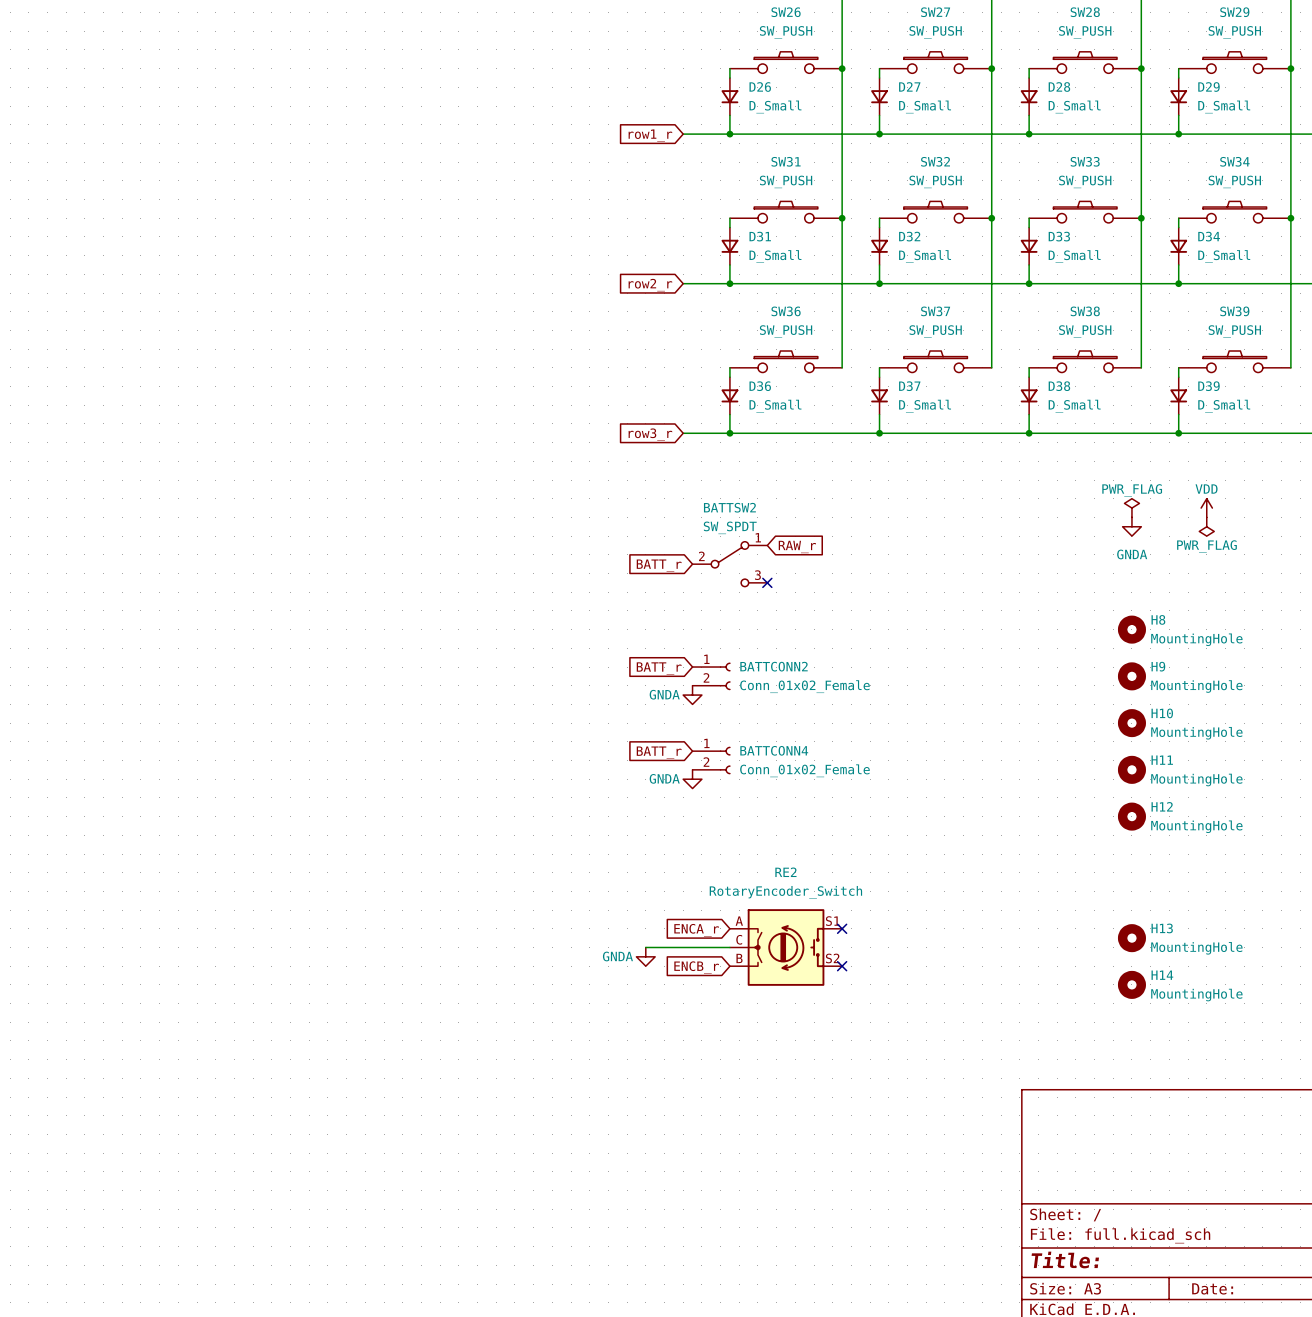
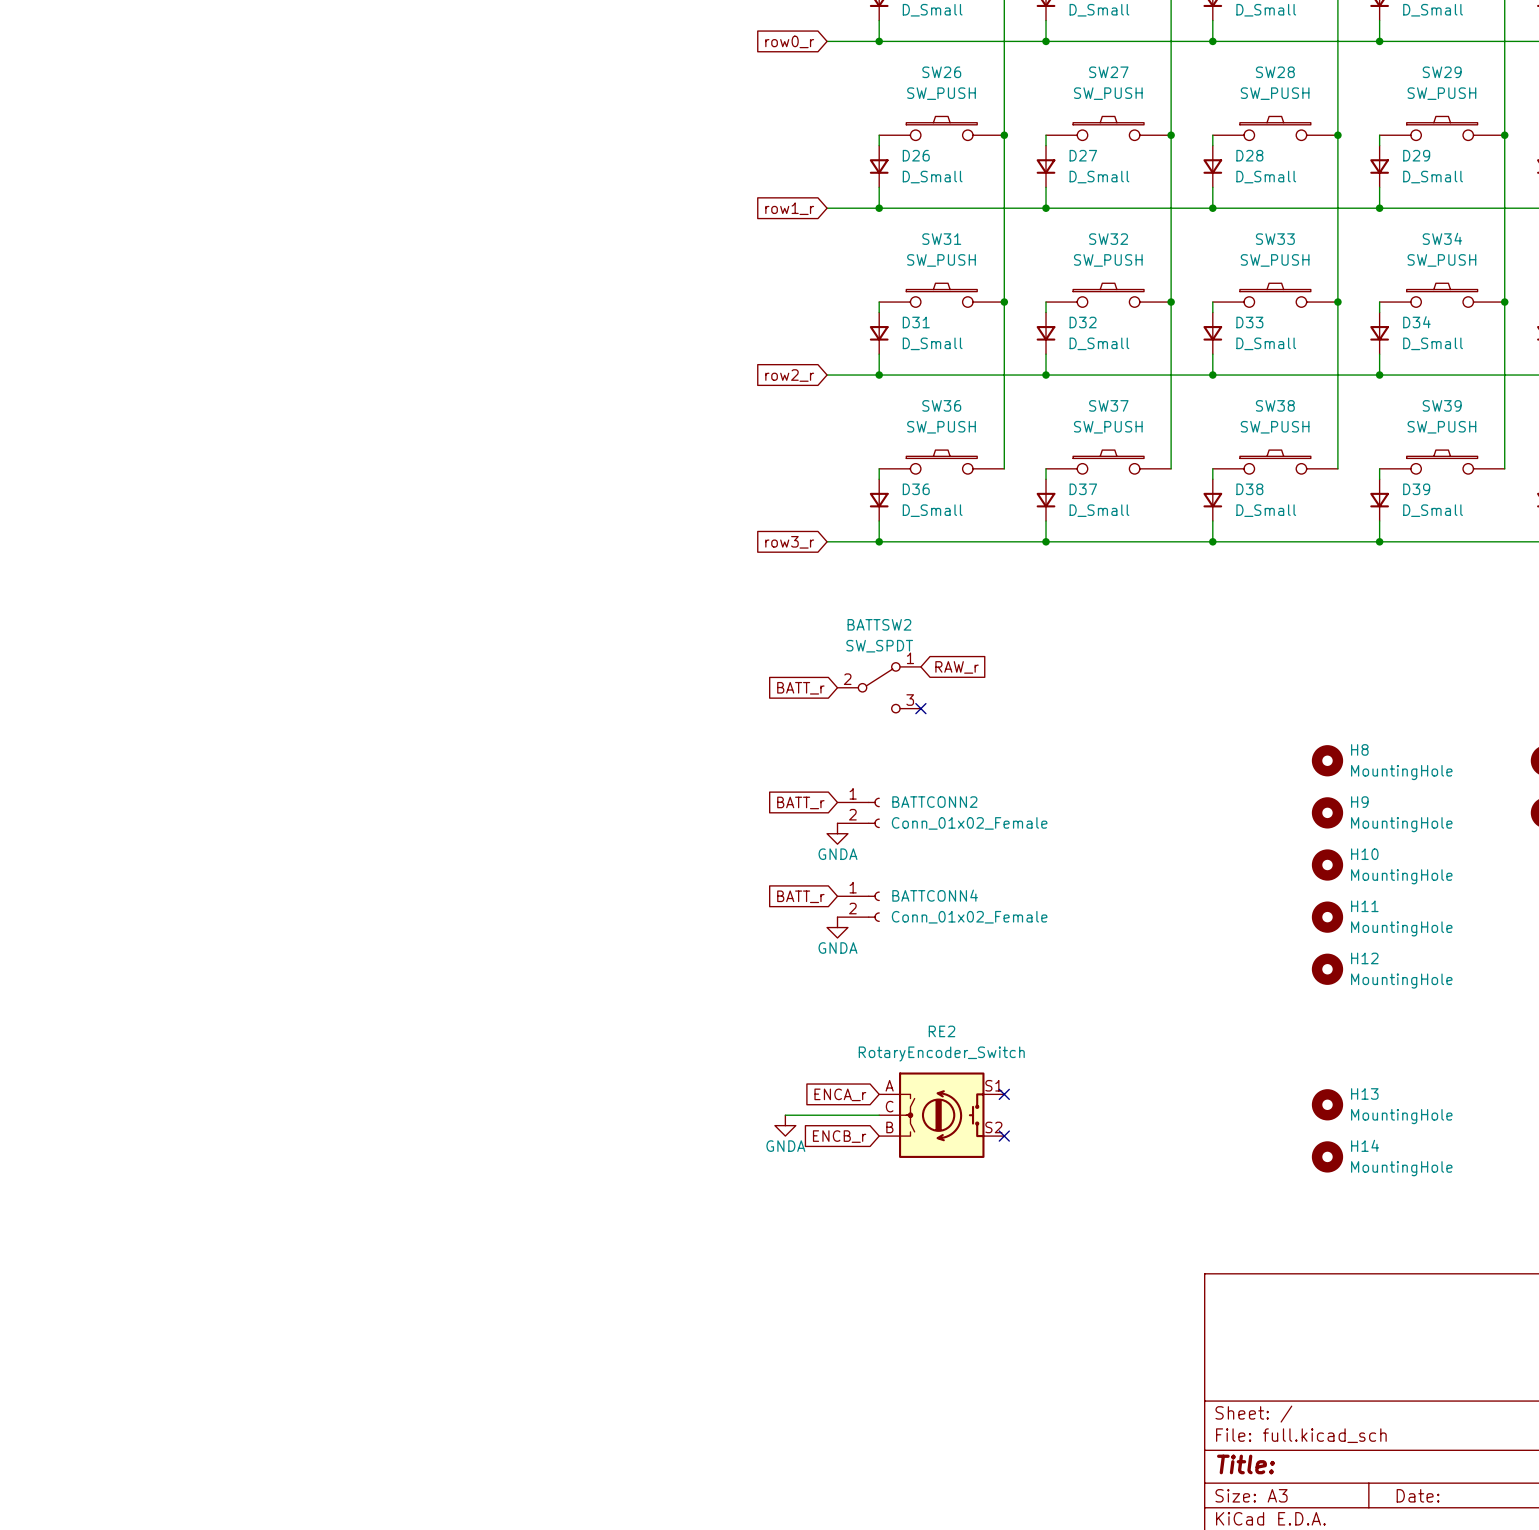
power symbol: PWR_FLAG (1131, 508) -> none
power symbol: VDD (1206, 508) -> none
power symbol: GNDA (1131, 526) -> none
power symbol: PWR_FLAG (1206, 526) -> none
power symbol text position: GNDA (664, 694) -> GNDA (837, 854)
power symbol text position: GNDA (664, 778) -> GNDA (837, 948)
power symbol text position: GNDA (617, 956) -> GNDA (785, 1146)

